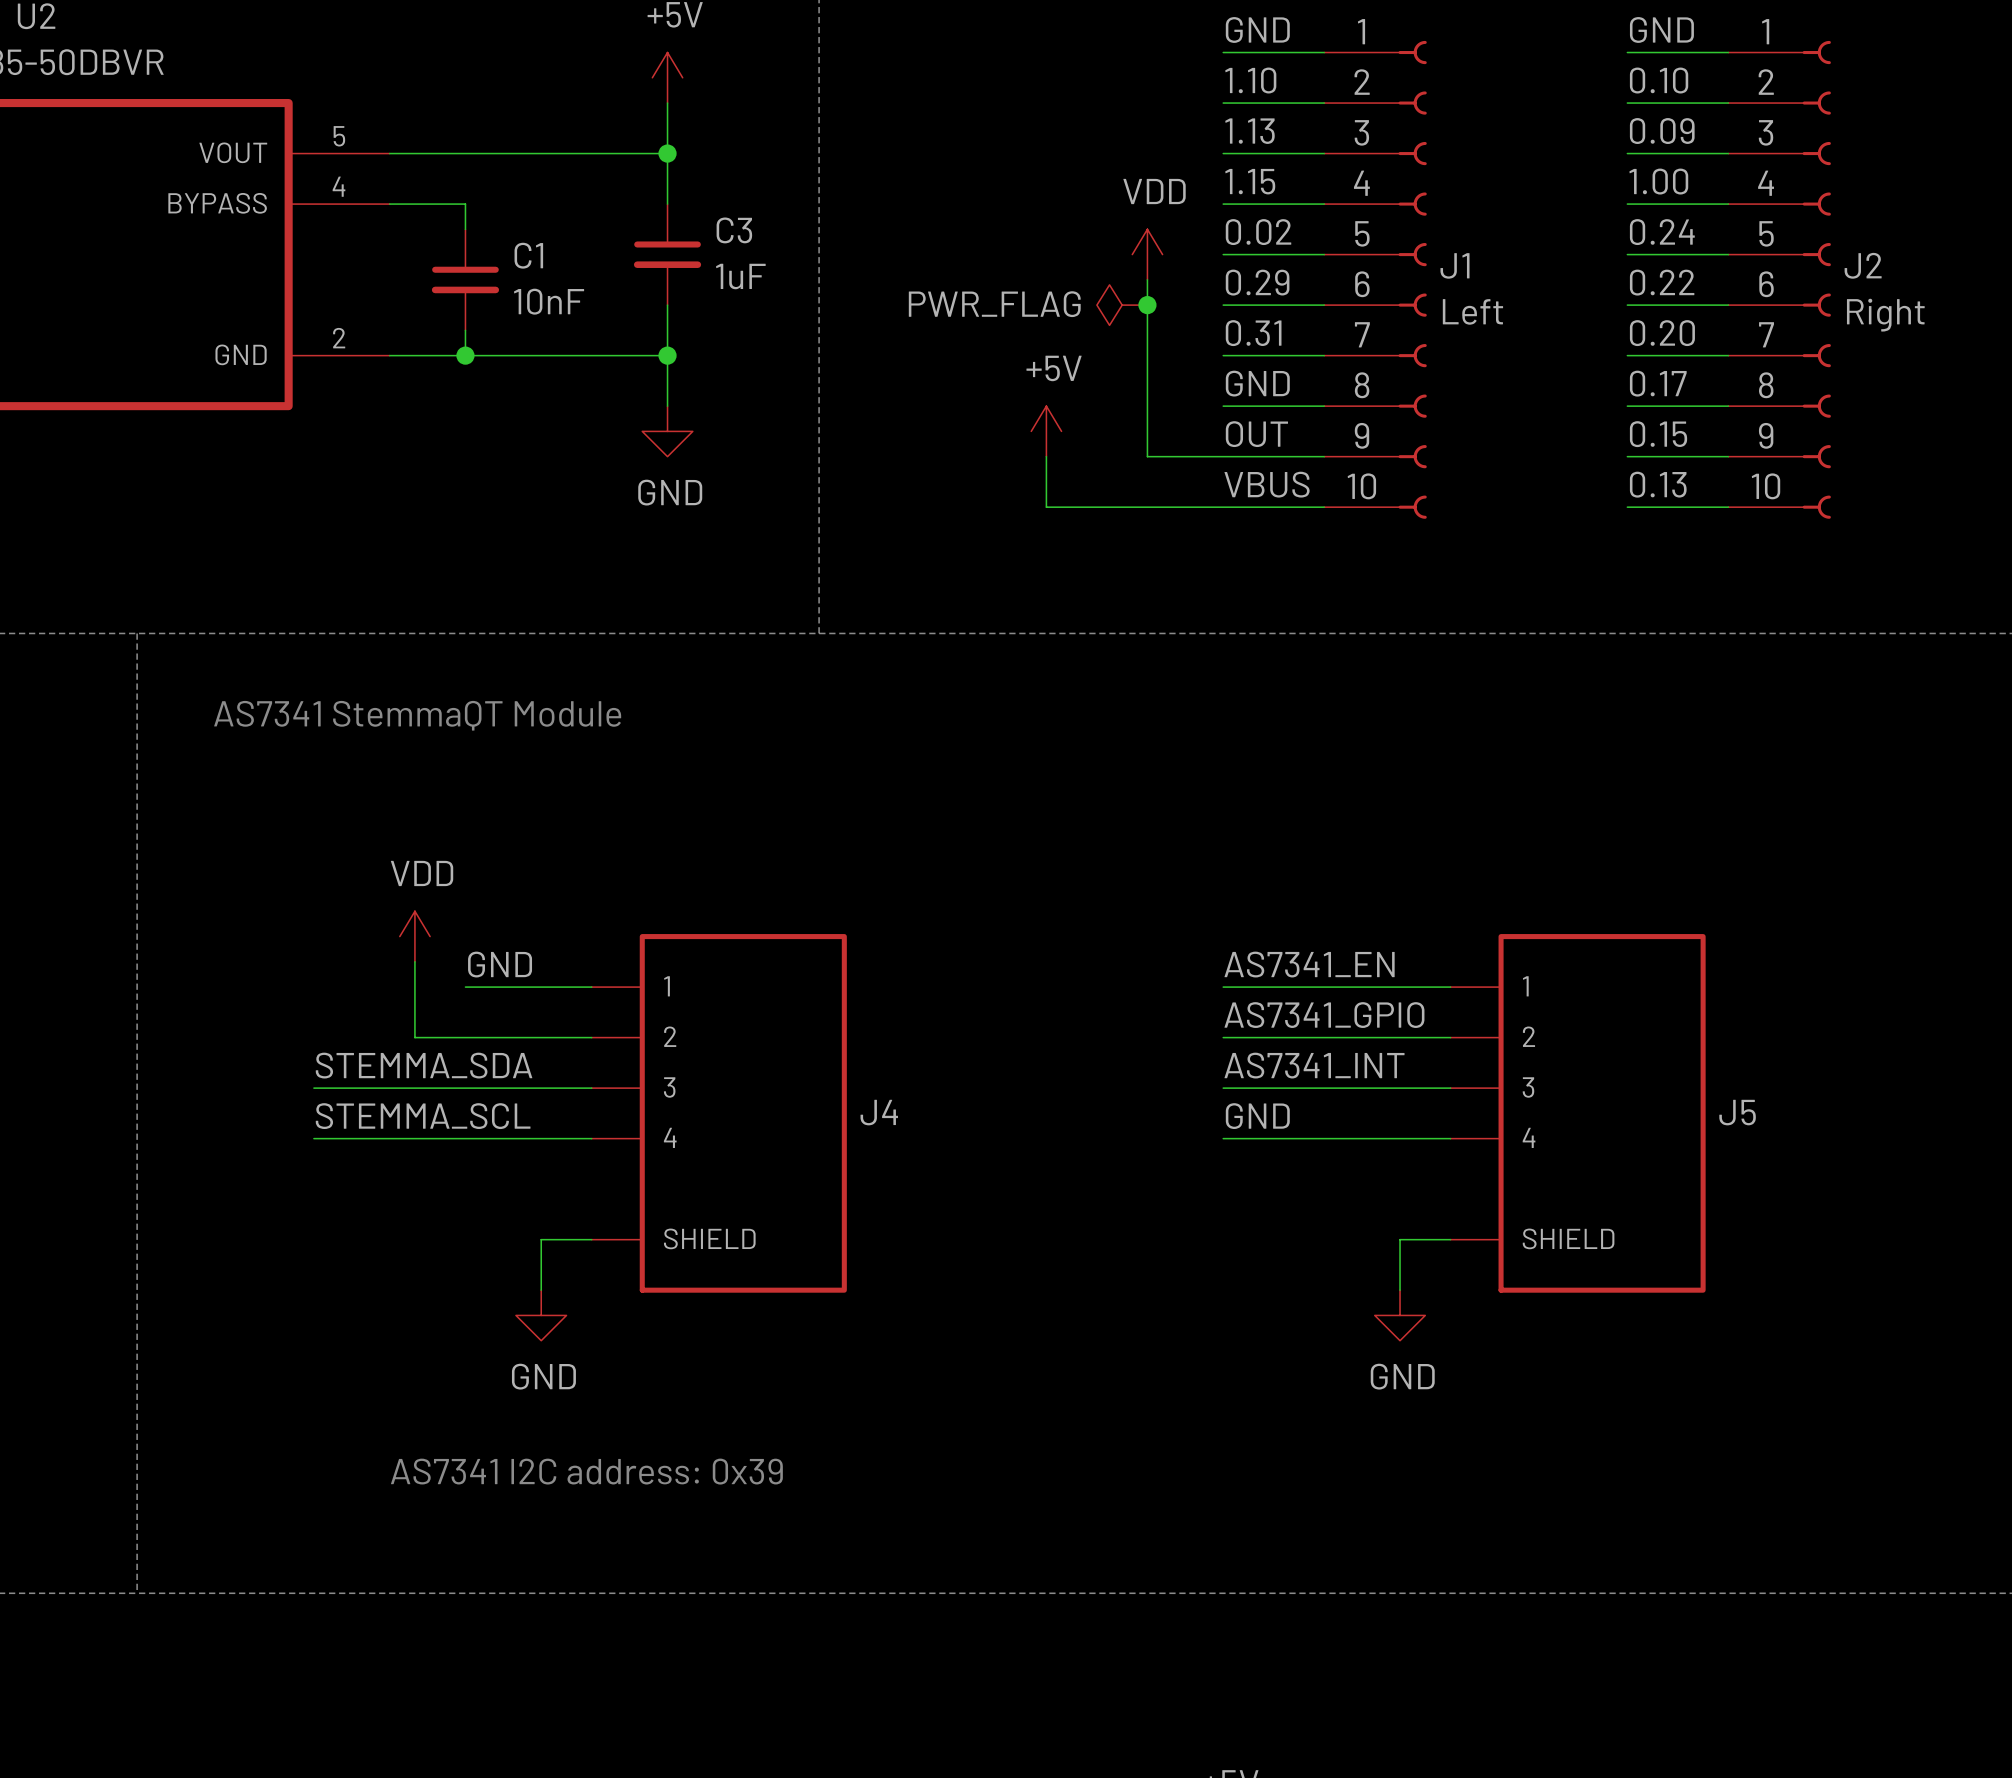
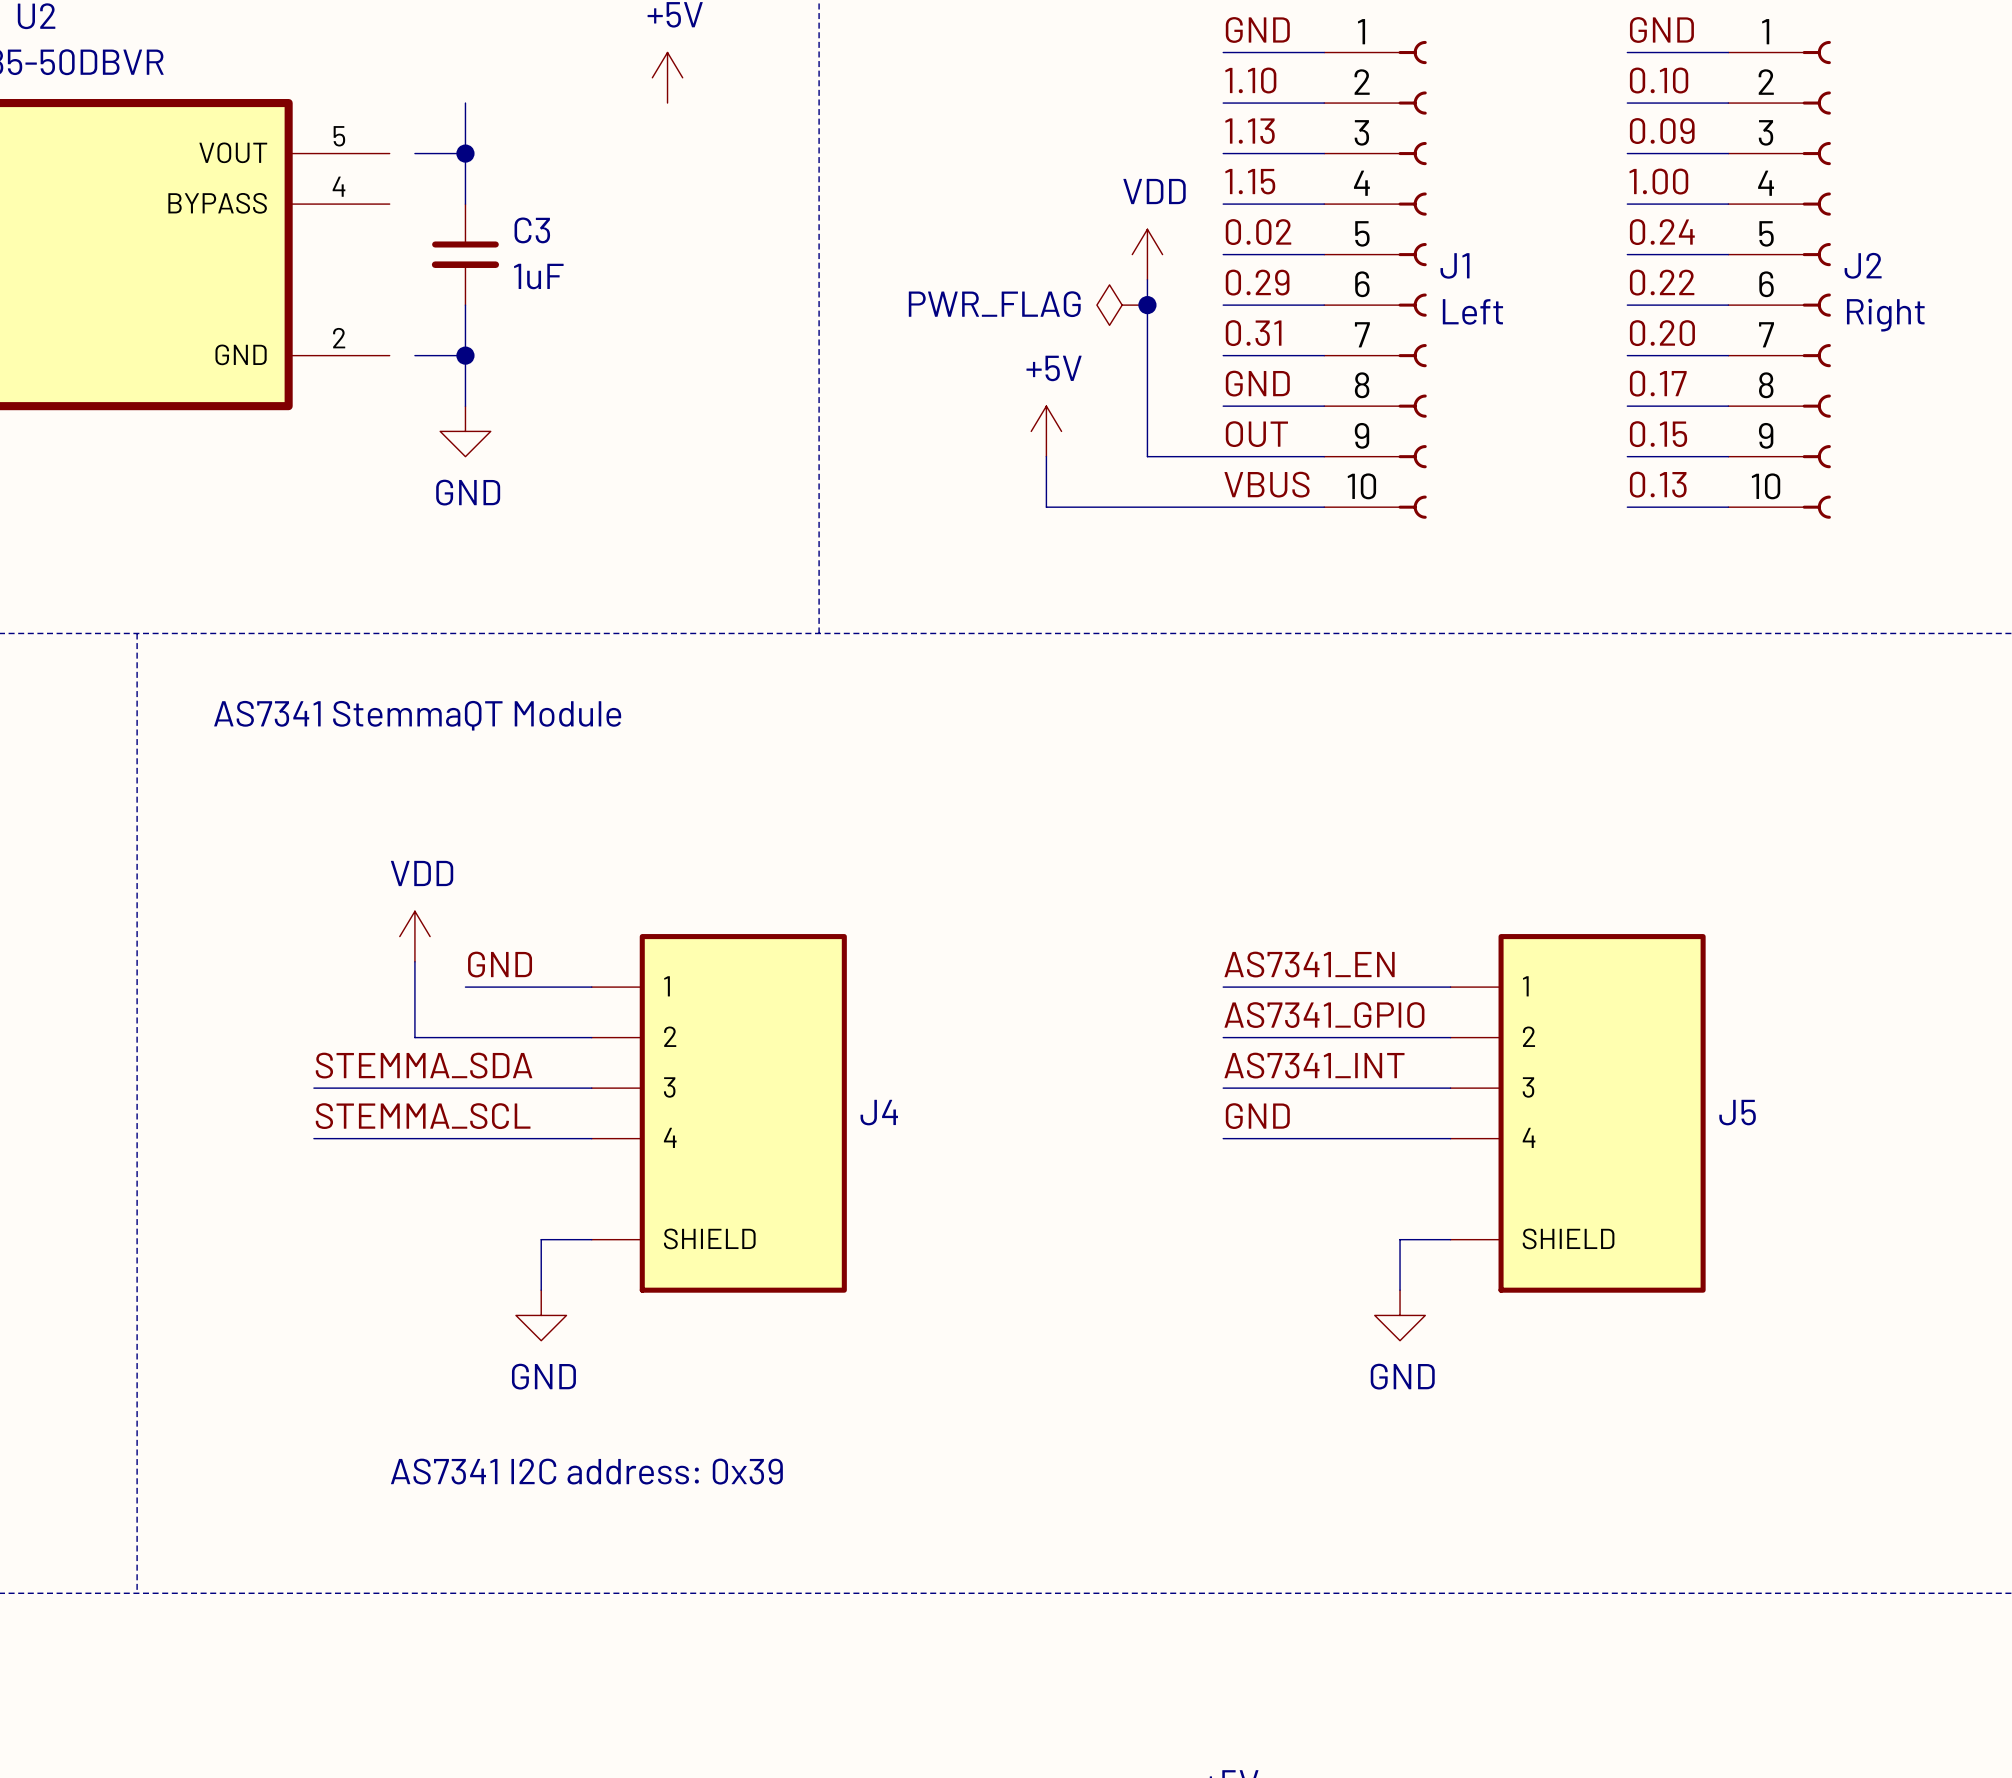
wire: (667, 103) (667, 204) -> (465, 103) (465, 204)
wire: (389, 153) (414, 153) -> none
wire: (465, 153) (667, 153) -> none
junction: none -> (465, 153)
junction: (667, 153) -> none
wire: (389, 204) (465, 204) (465, 229) -> none
C3 position: (667, 254) -> (465, 254)
C1: 10nF (465, 279) -> none
wire: (667, 305) (667, 406) -> none
wire: (389, 355) (414, 355) -> none
wire: (465, 355) (667, 355) -> (465, 355) (465, 406)
junction: (667, 355) -> none
power symbol position: GND (667, 431) -> GND (465, 431)

